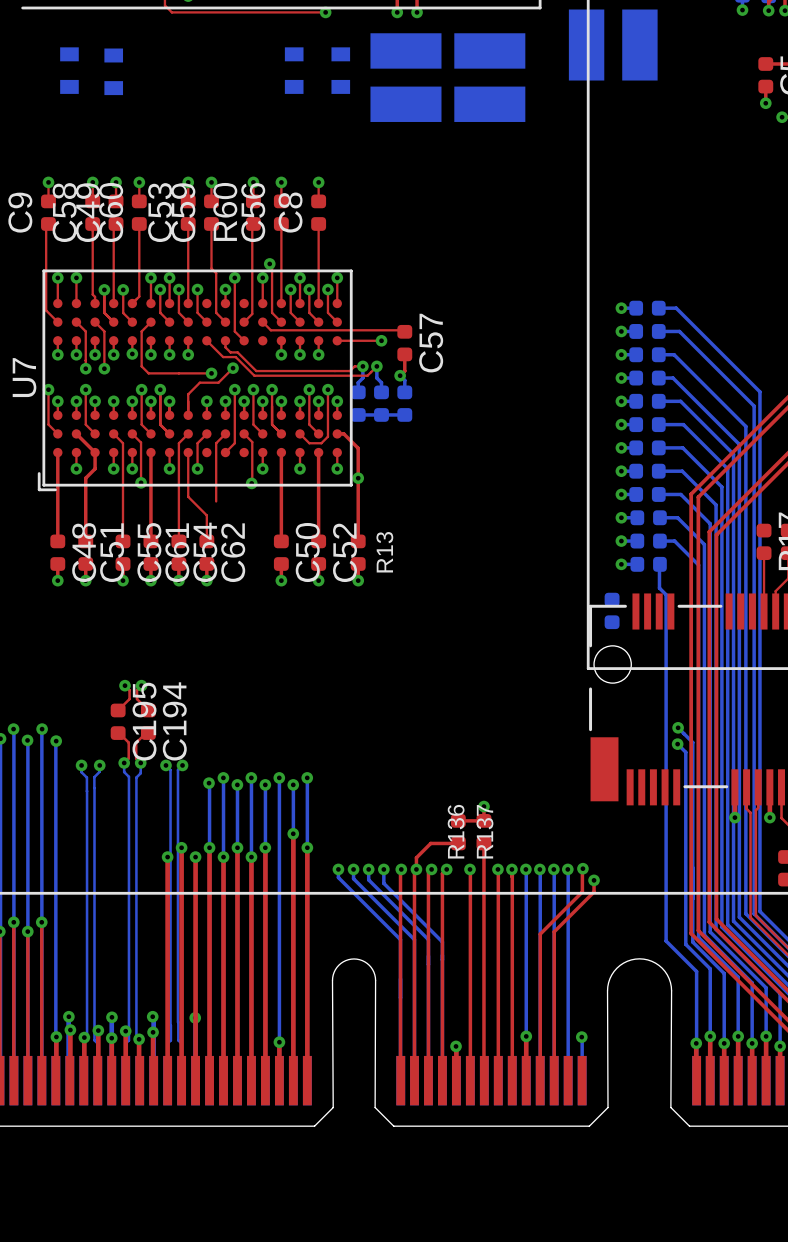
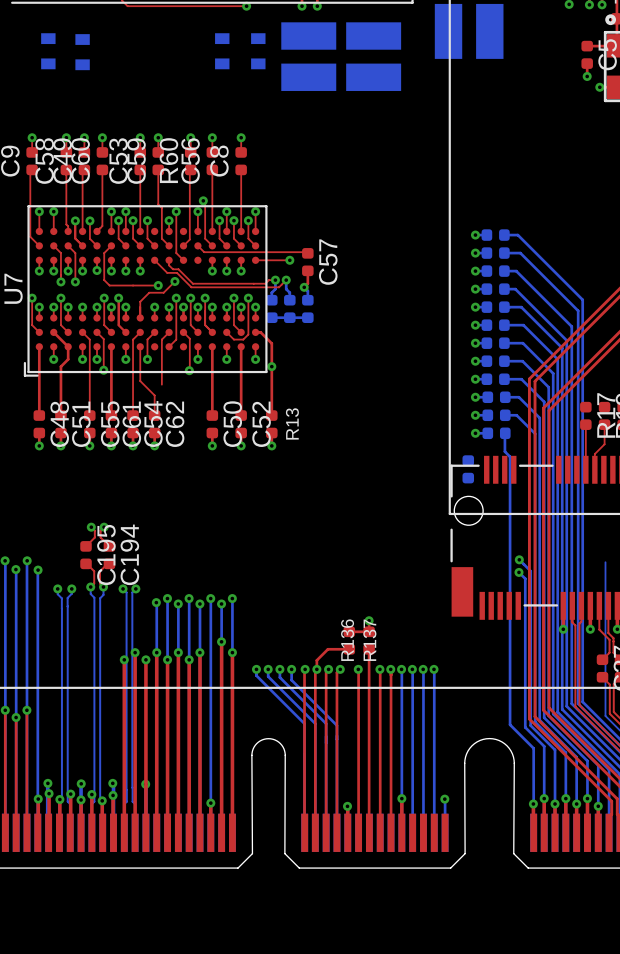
top track: (582, 868) (582, 892) (540, 934) (540, 1080) -> none
via: (582, 868) -> none
top track: (594, 880) (594, 892) (554, 931) (554, 1080) -> none
via: (594, 880) -> none

